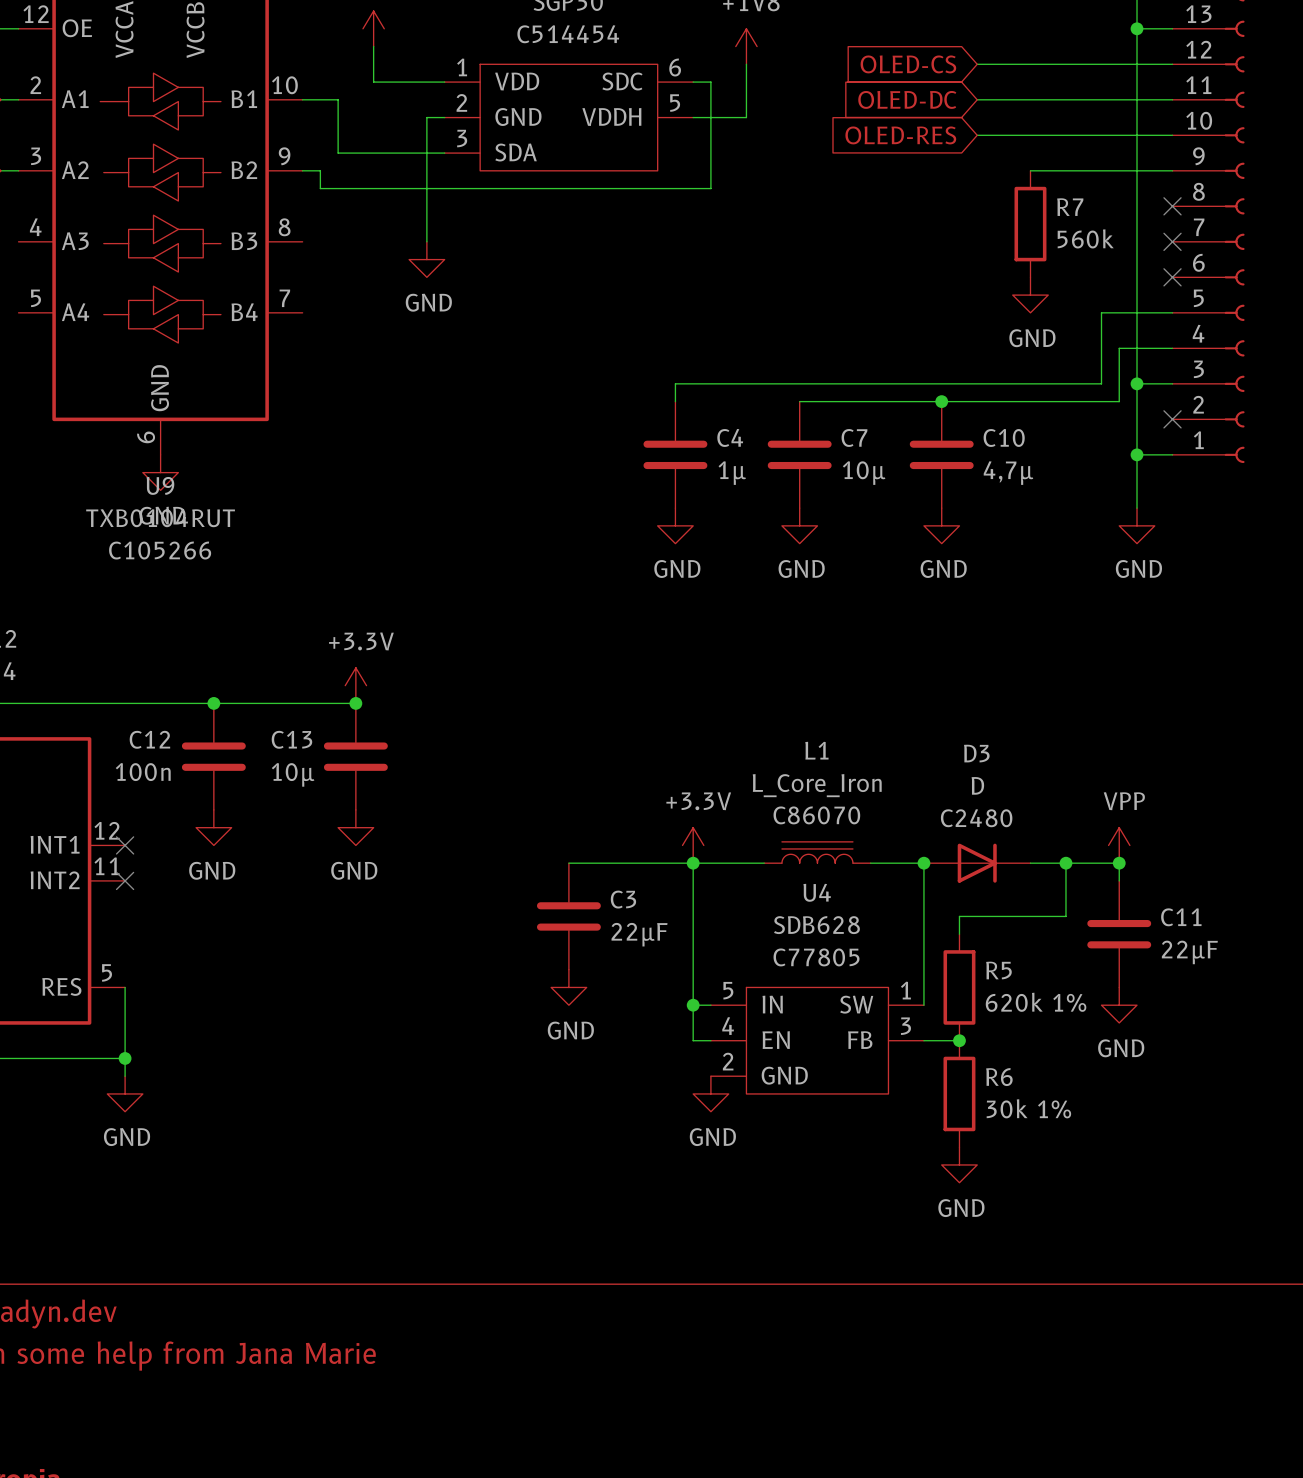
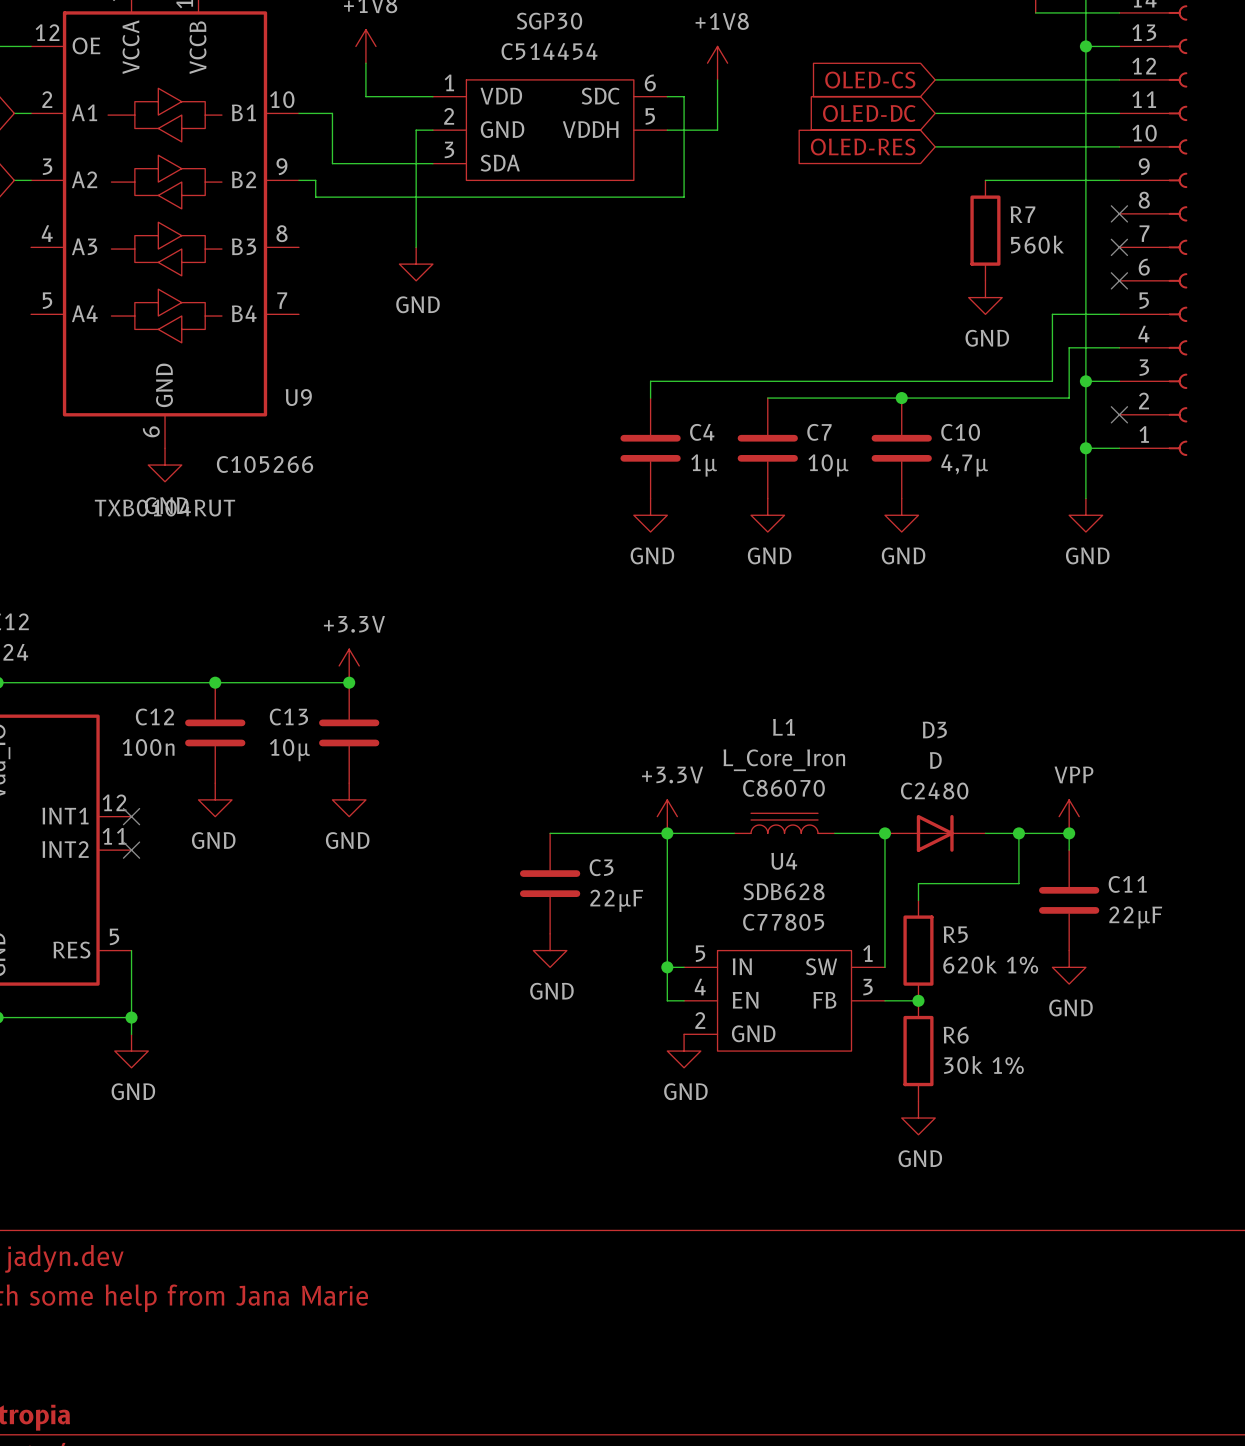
U9 name position: U9 (160, 485) -> U9 (298, 397)
U9 text position: C105266 (160, 550) -> C105266 (265, 464)

